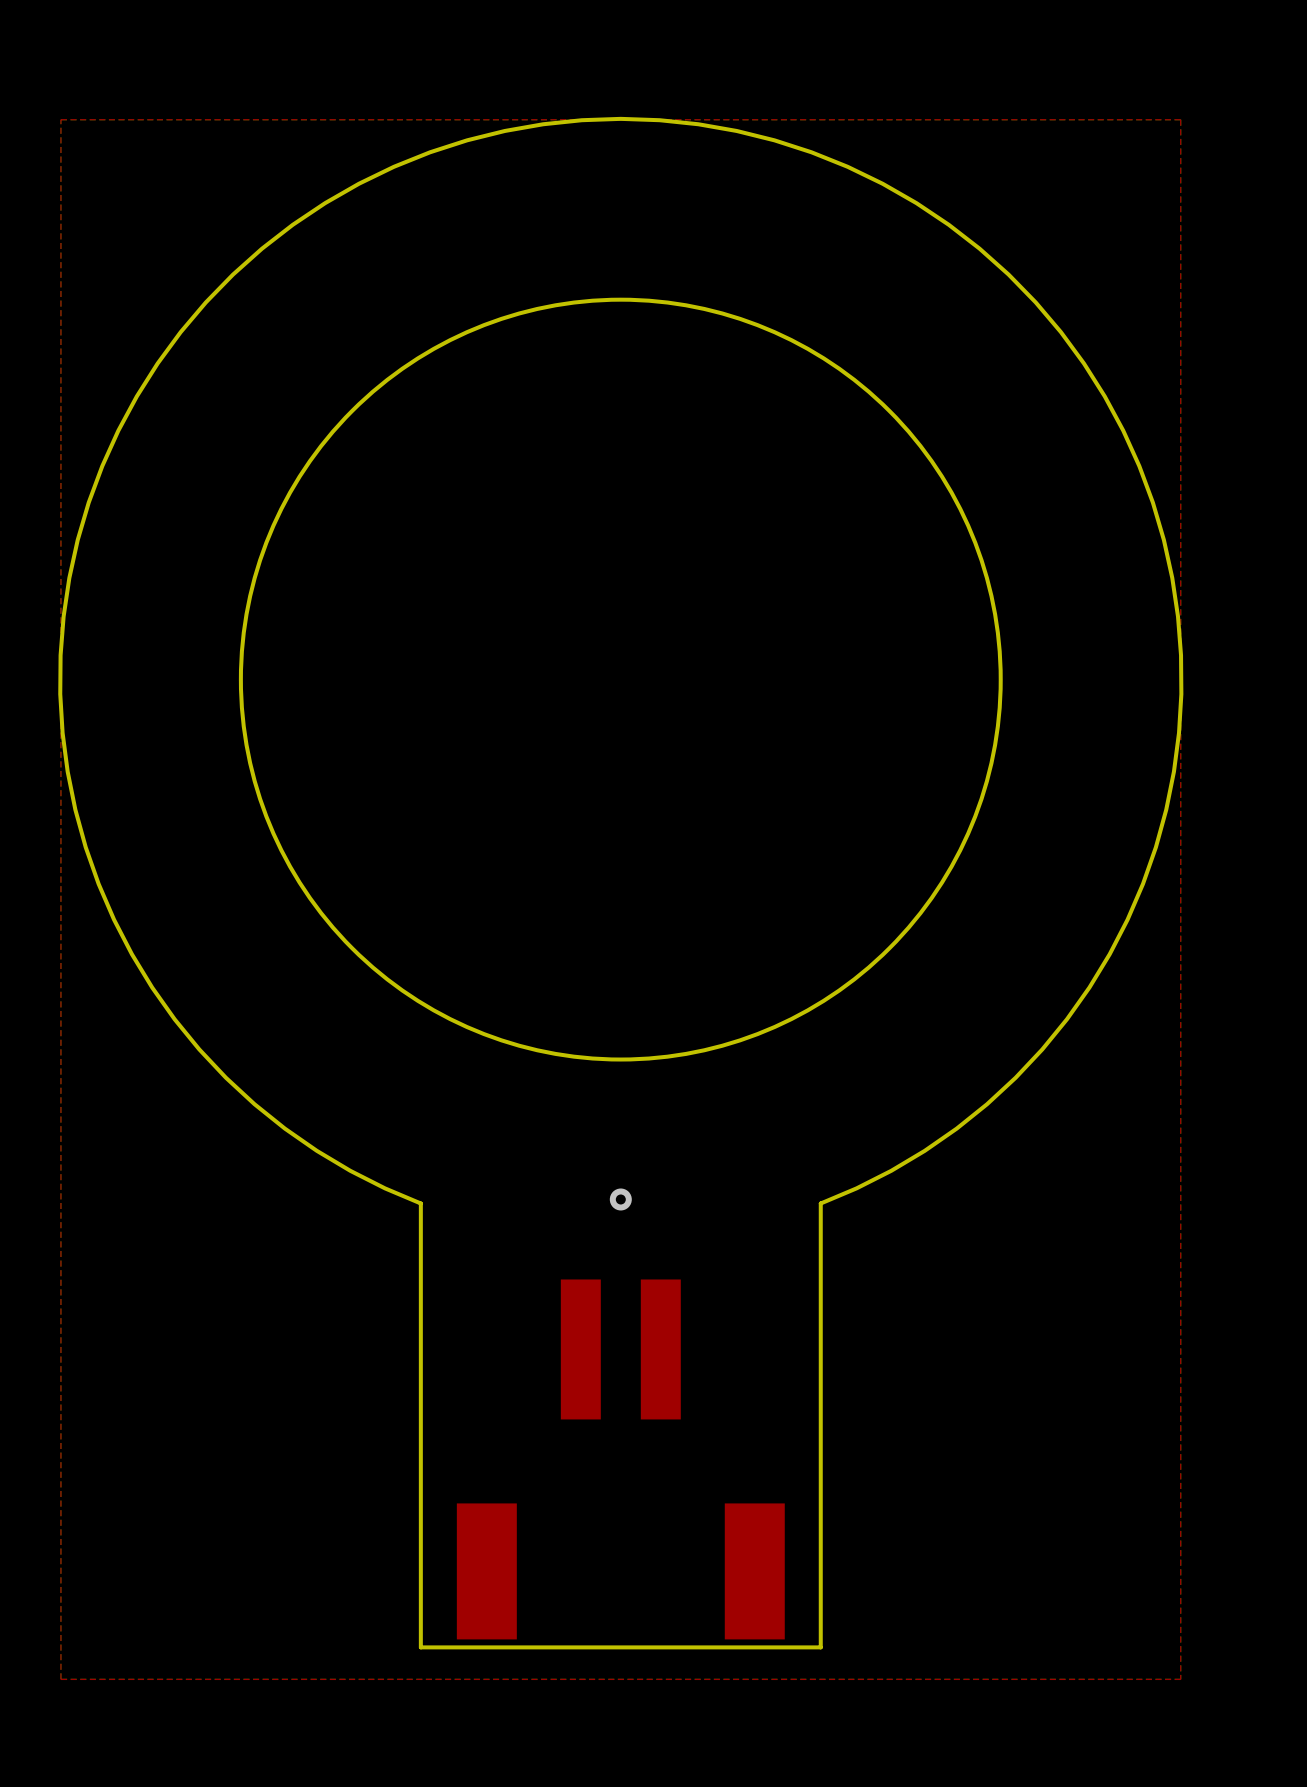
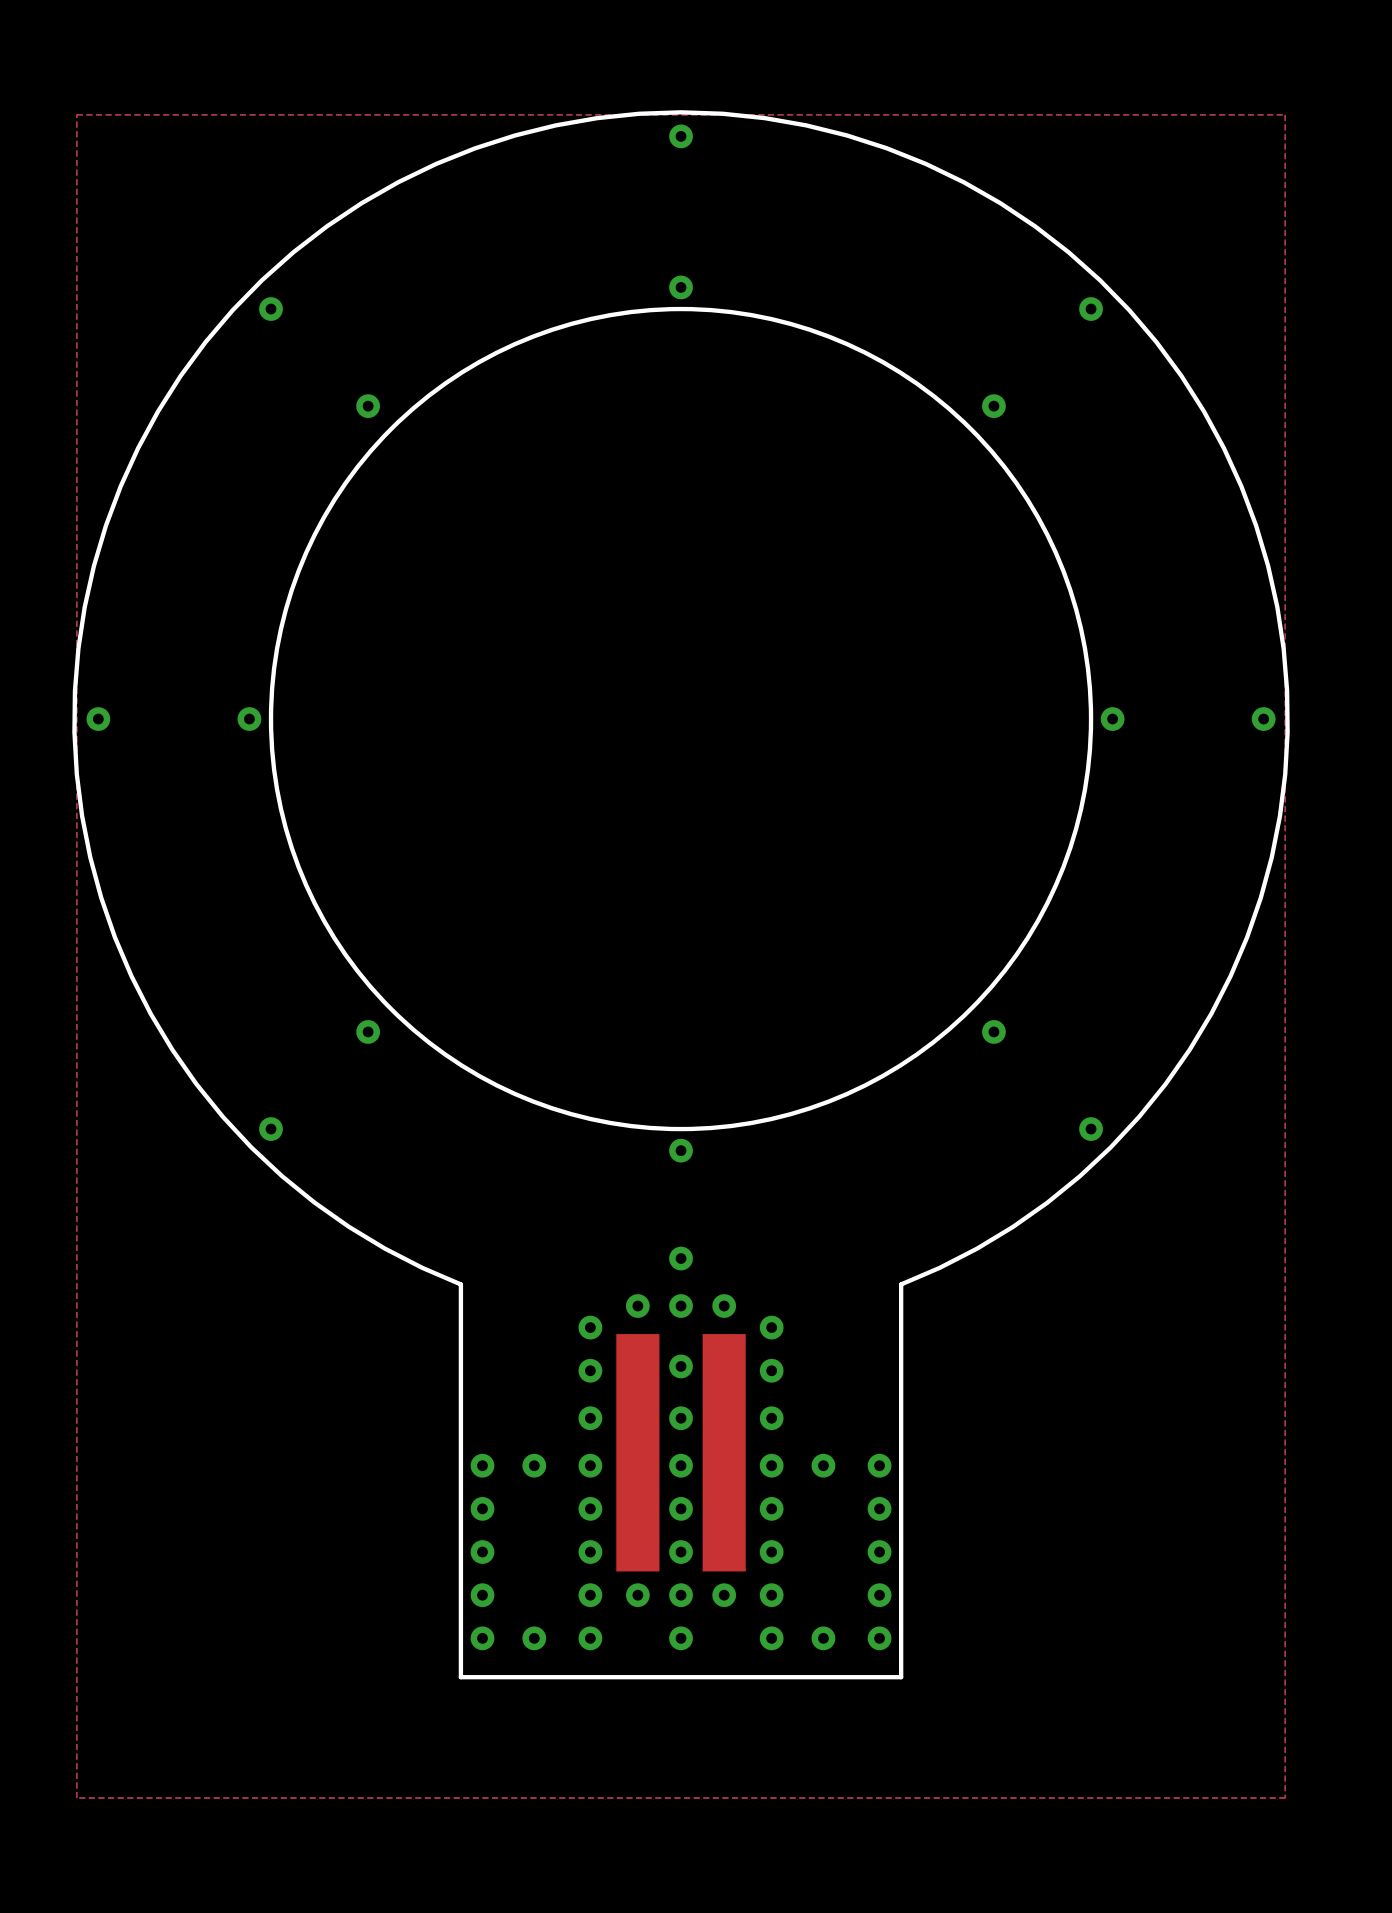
via: none -> (681, 136)
via: none -> (681, 287)
via: none -> (271, 309)
via: none -> (1091, 309)
via: none -> (368, 406)
via: none -> (993, 406)
via: none -> (98, 719)
via: none -> (249, 719)
via: none -> (1112, 719)
via: none -> (1263, 719)
via: none -> (368, 1031)
via: none -> (993, 1031)
via: none -> (271, 1129)
via: none -> (1091, 1129)
via: none -> (681, 1150)
via position: (620, 1199) -> (681, 1258)
board edge: (420, 1203) (420, 1647) (820, 1647) (820, 1203) (891, 1170) (924, 1150) (987, 1104) (1042, 1049) (1089, 987) (1127, 919) (1155, 847) (1173, 771) (1181, 694) (1177, 616) (1172, 577) (1152, 502) (1123, 430) (1083, 363) (1060, 332) (1008, 274) (948, 224) (882, 183) (811, 152) (736, 130) (698, 124) (620, 118) (581, 120) (504, 130) (467, 140) (393, 166) (358, 183) (325, 203) (262, 248) (205, 302) (157, 363) (136, 396) (102, 466) (88, 502) (77, 539) (63, 616) (60, 694) (62, 733) (67, 771) (85, 847) (114, 919) (131, 954) (174, 1019) (199, 1049) (254, 1104) (316, 1150) (385, 1188) (420, 1203) -> (460, 1284) (460, 1677) (901, 1677) (901, 1284) (977, 1248) (1013, 1226) (1079, 1176) (1110, 1147) (1165, 1084) (1189, 1049) (1211, 1013) (1247, 937) (1260, 897) (1279, 816) (1285, 774) (1287, 690) (1277, 607) (1268, 566) (1256, 525) (1223, 448) (1181, 375) (1156, 342) (1099, 280) (1068, 252) (1000, 203) (963, 182) (886, 148) (846, 135) (764, 118) (723, 113) (639, 113) (555, 125) (515, 135) (436, 163) (361, 203) (326, 226) (293, 252) (232, 310) (205, 342) (158, 411) (138, 448) (105, 525) (93, 566) (78, 648) (74, 690) (76, 774) (82, 816) (101, 897) (131, 976) (150, 1013) (196, 1084) (251, 1147) (282, 1176) (349, 1226) (422, 1267) (460, 1284)
via: none -> (637, 1306)
via: none -> (681, 1306)
via: none -> (724, 1306)
via: none -> (590, 1327)
via: none -> (771, 1327)
via: none -> (681, 1366)
via: none -> (590, 1370)
via: none -> (771, 1370)
via: none -> (590, 1418)
via: none -> (681, 1418)
via: none -> (771, 1418)
part: none -> (681, 1452)
via: none -> (482, 1465)
via: none -> (534, 1465)
via: none -> (590, 1465)
via: none -> (681, 1465)
via: none -> (771, 1465)
via: none -> (823, 1465)
via: none -> (879, 1465)
via: none -> (482, 1508)
via: none -> (590, 1508)
via: none -> (681, 1508)
via: none -> (771, 1508)
via: none -> (879, 1508)
via: none -> (482, 1552)
via: none -> (590, 1552)
via: none -> (681, 1552)
via: none -> (771, 1552)
via: none -> (879, 1552)
part: (620, 1459) -> none
via: none -> (482, 1595)
via: none -> (590, 1595)
via: none -> (637, 1595)
via: none -> (681, 1595)
via: none -> (724, 1595)
via: none -> (771, 1595)
via: none -> (879, 1595)
via: none -> (482, 1638)
via: none -> (534, 1638)
via: none -> (590, 1638)
via: none -> (681, 1638)
via: none -> (771, 1638)
via: none -> (823, 1638)
via: none -> (879, 1638)

